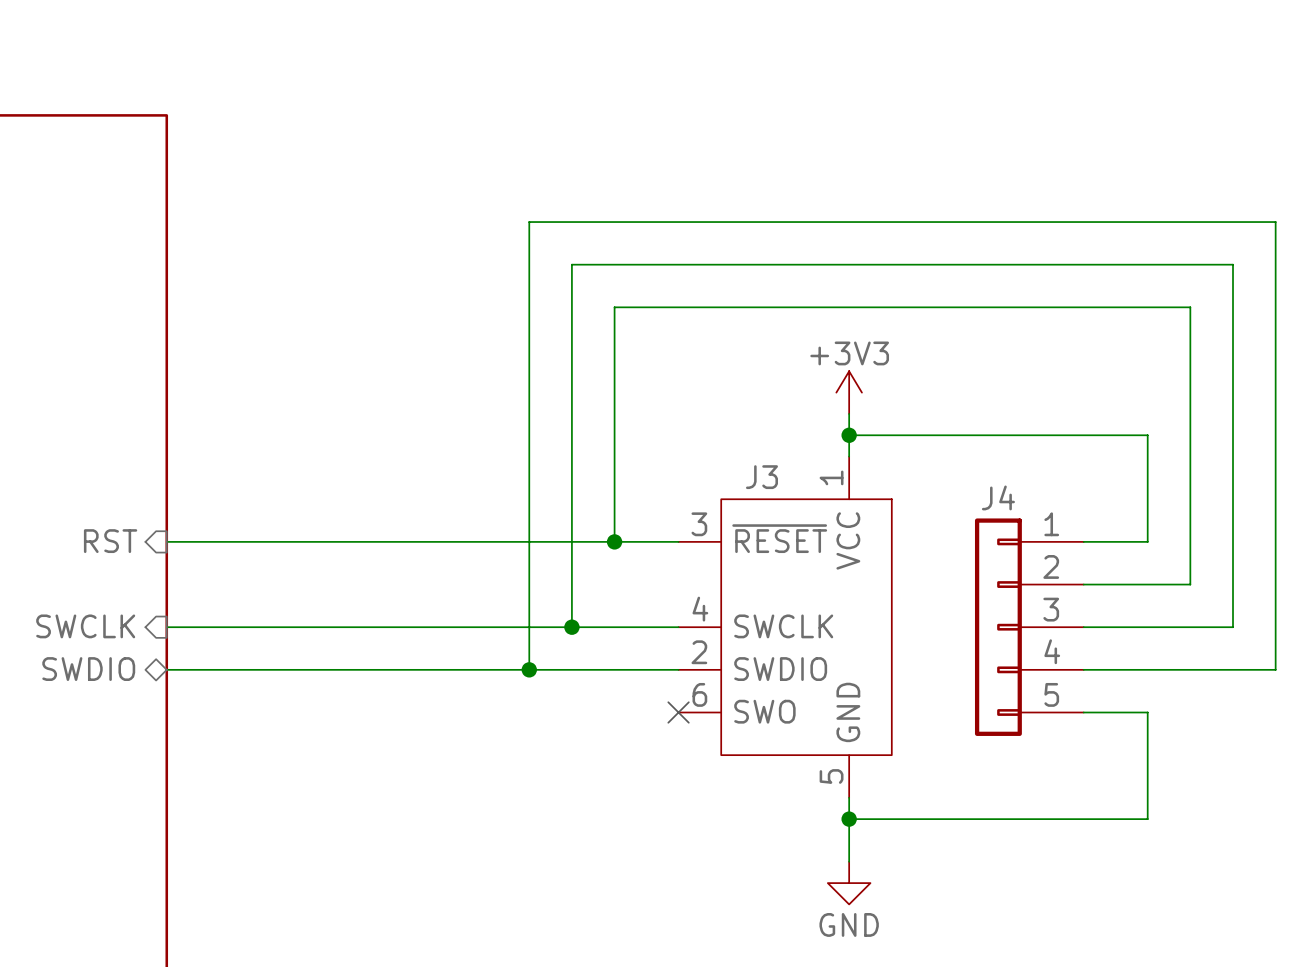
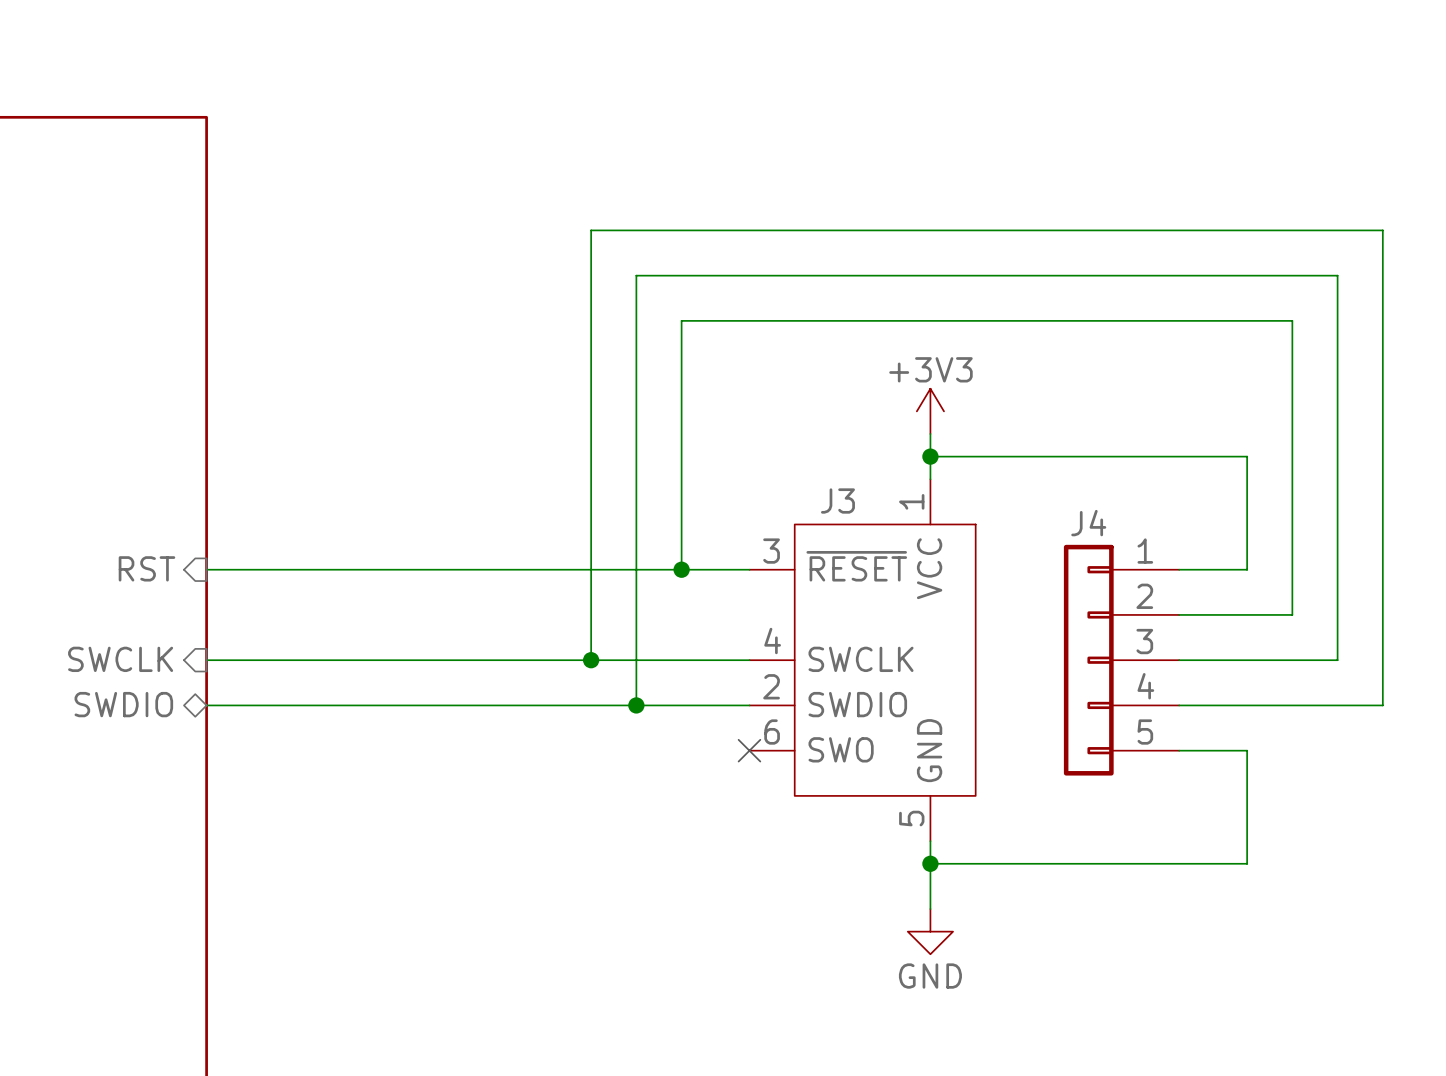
wire: (529, 627) (529, 669) -> (636, 660) (636, 705)
junction: none -> (591, 660)
junction: (571, 627) -> none
junction: (529, 669) -> none
junction: none -> (636, 705)

